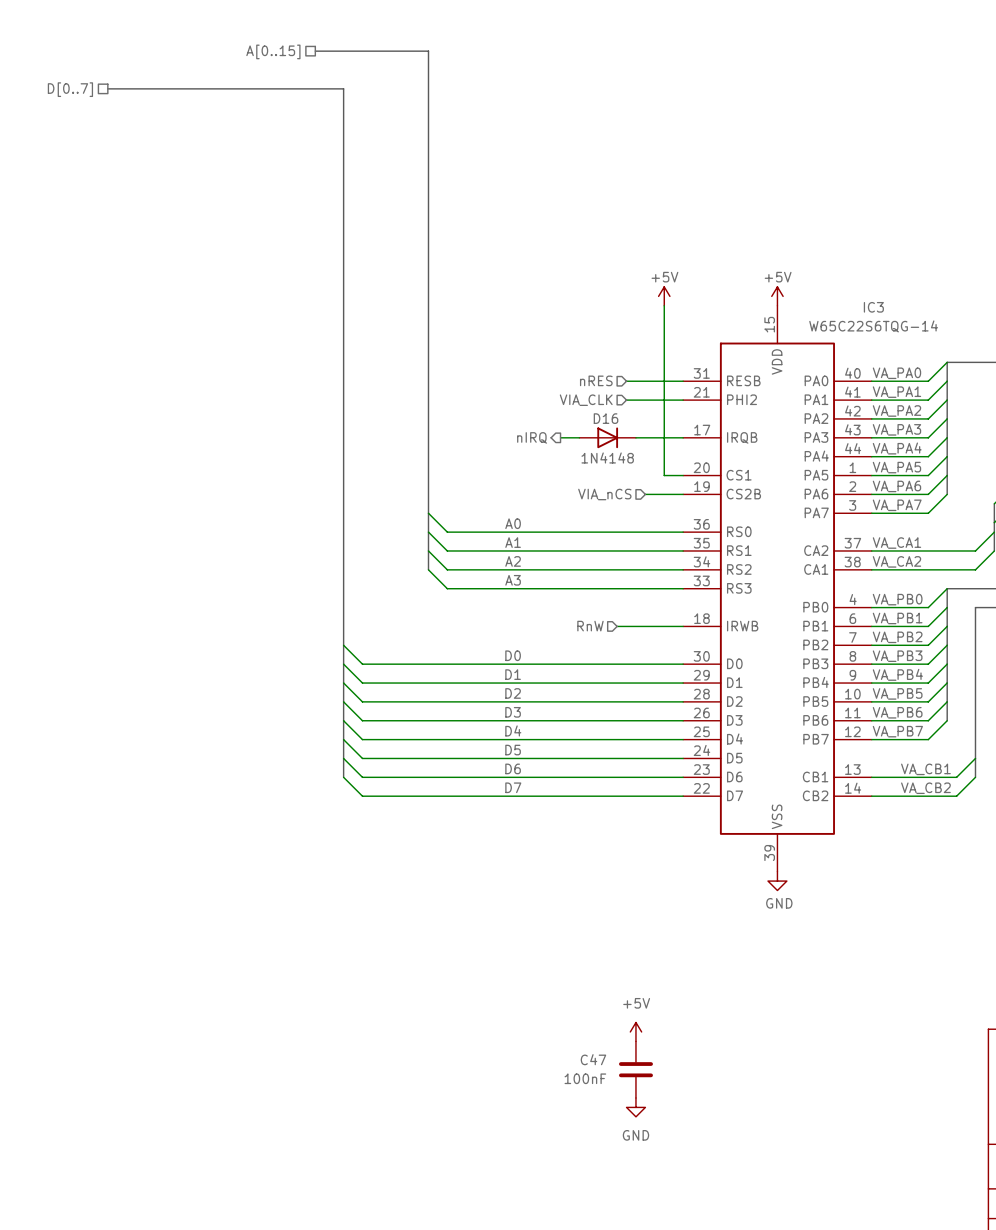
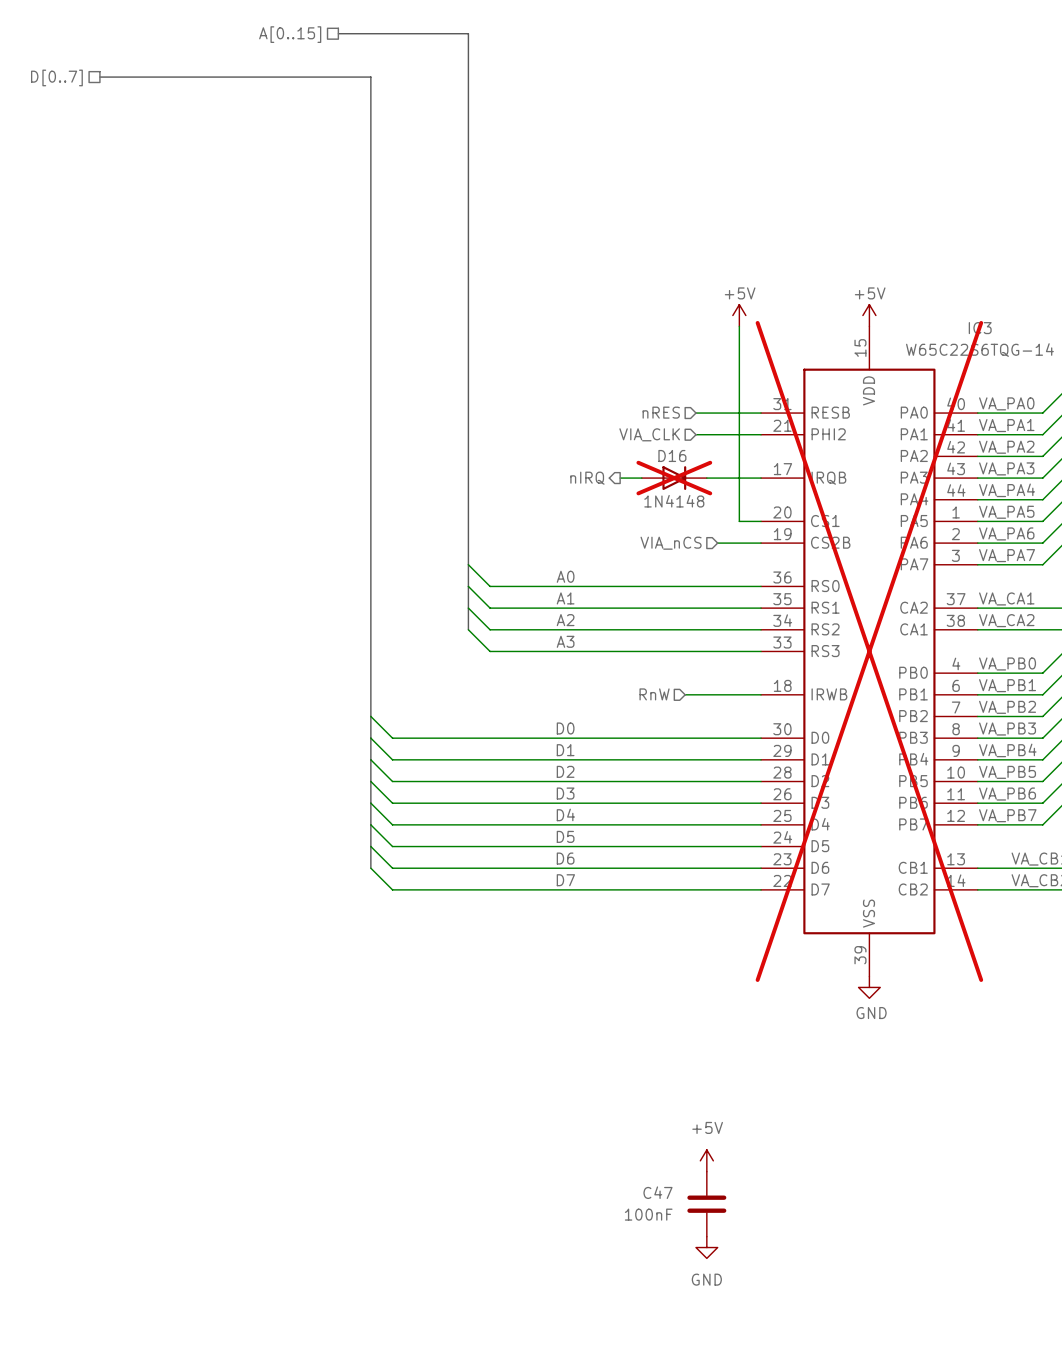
D16 do-not-place cross: none -> (674, 478)
IC3 do-not-place cross: none -> (869, 651)

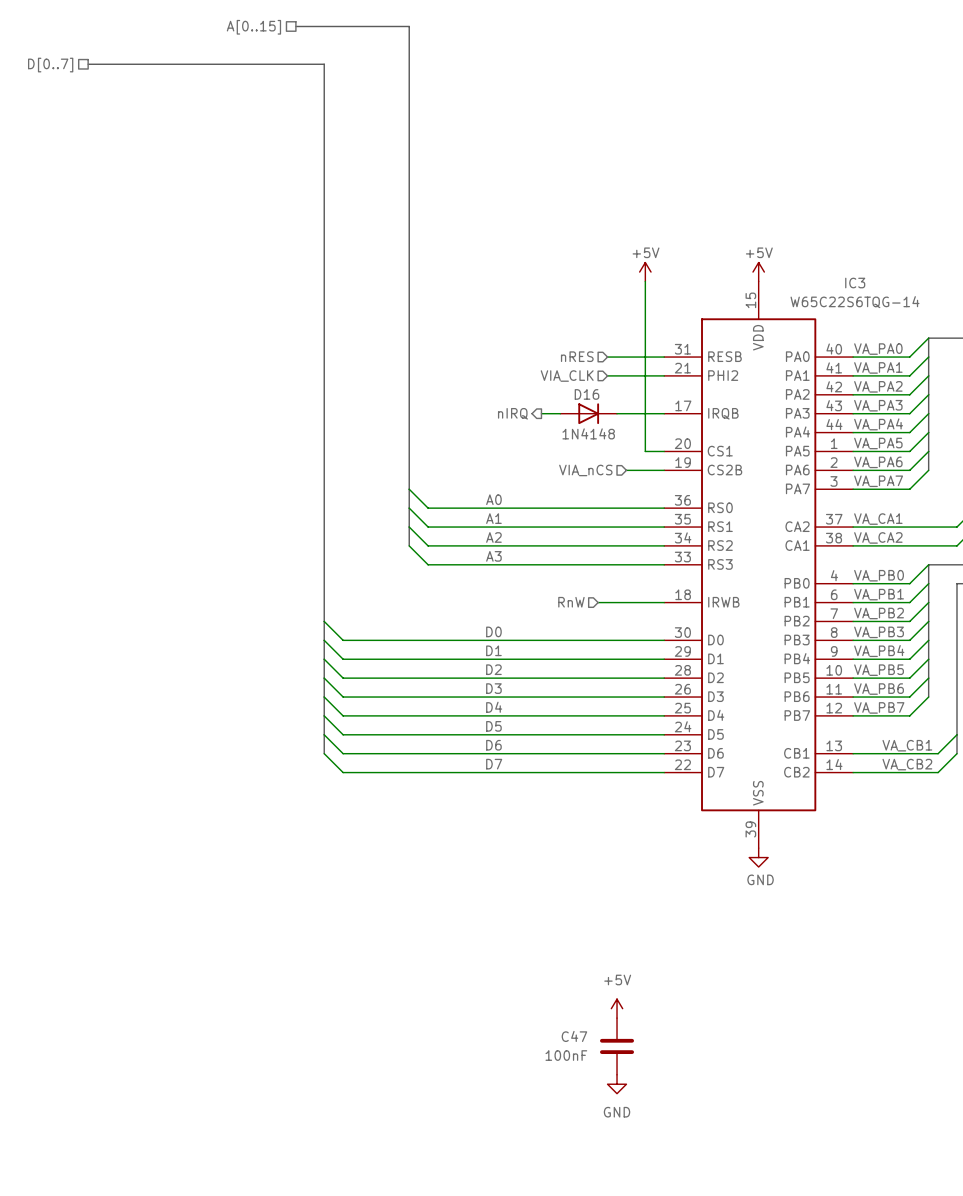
D16 do-not-place cross: (674, 478) -> none
IC3 do-not-place cross: (869, 651) -> none

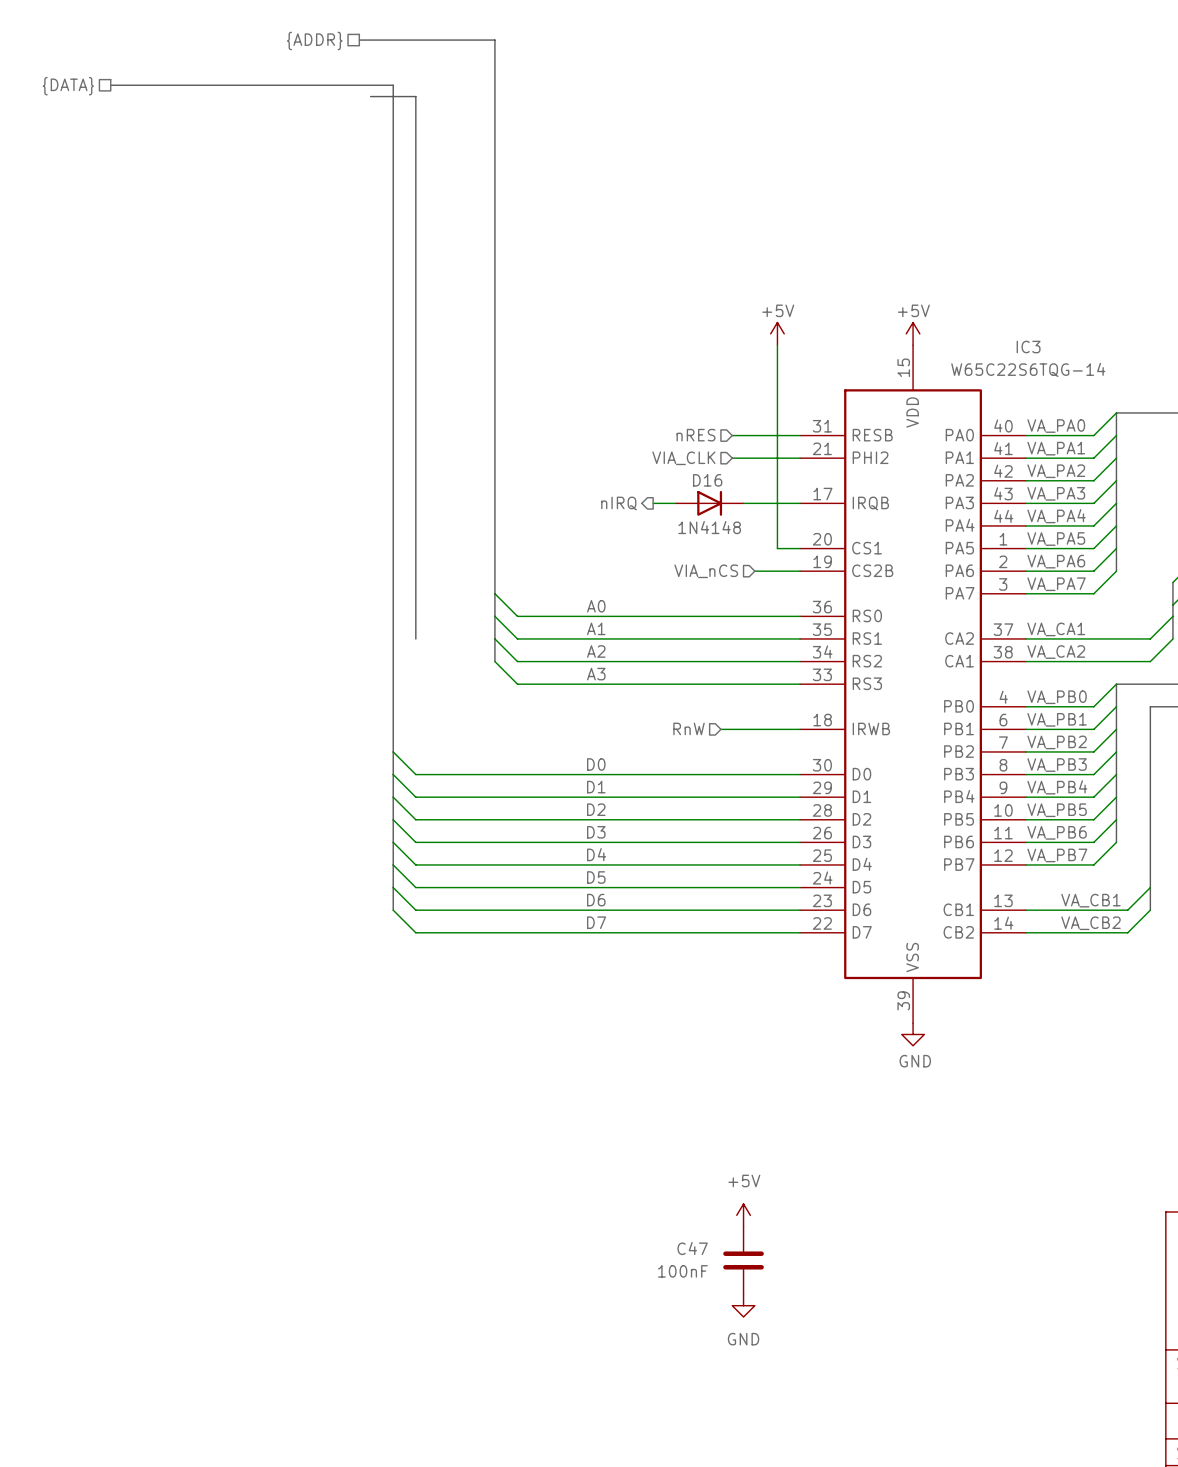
hierarchical label: A[0..15] (253, 27) -> {ADDR} (314, 40)
hierarchical label: D[0..7] (50, 65) -> {DATA} (68, 86)
bus: none -> (370, 96) (415, 96) (415, 638)

